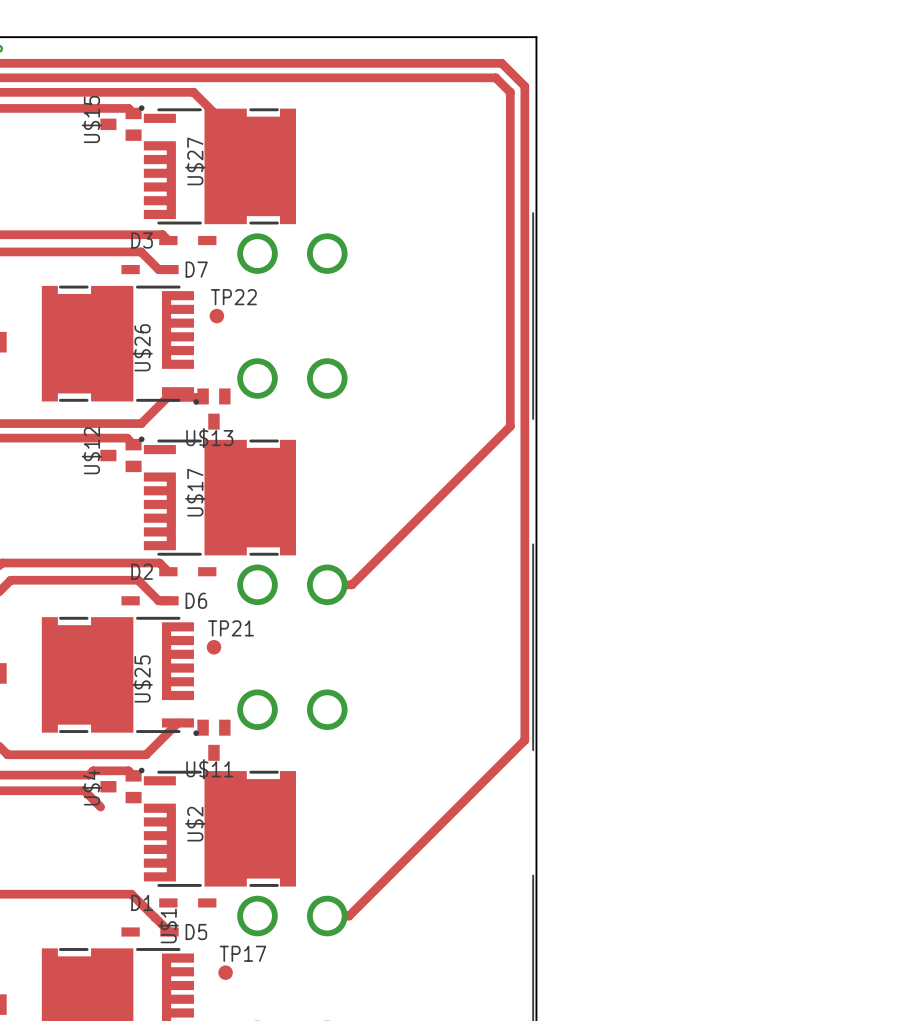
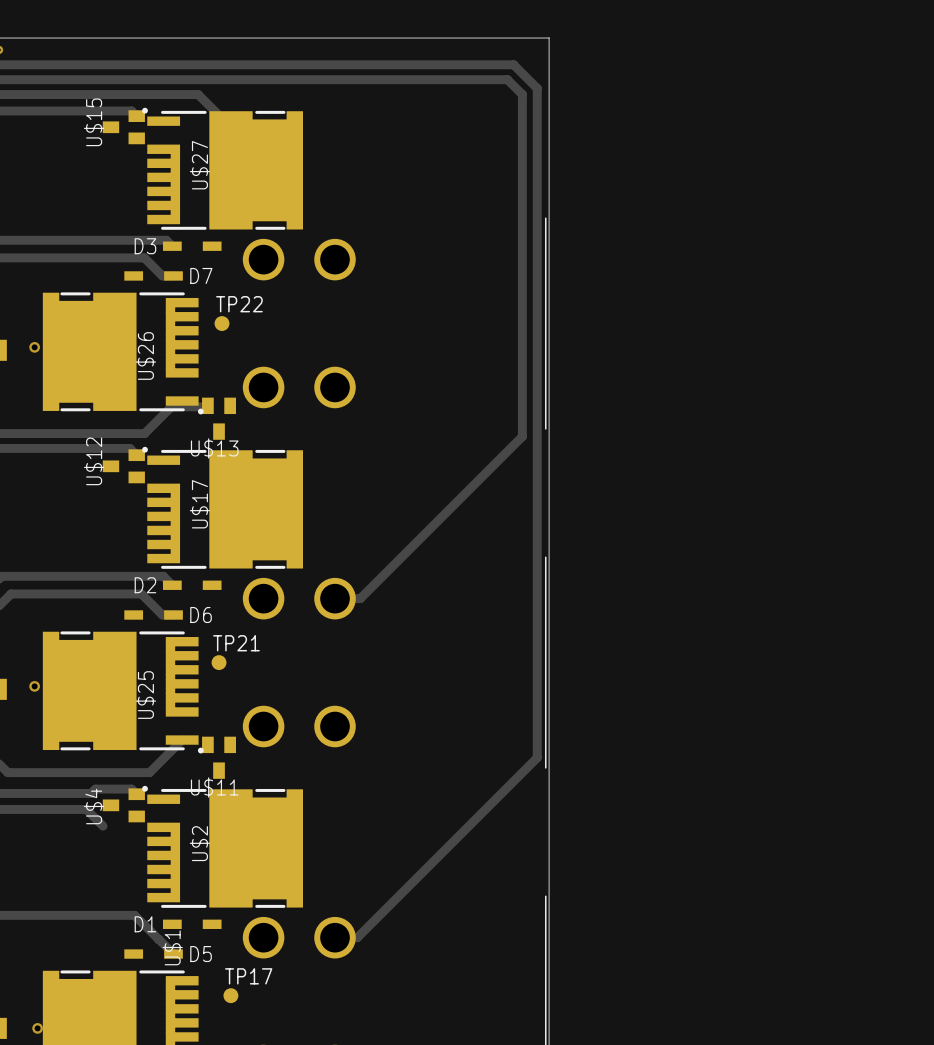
via: none -> (34, 347)
via: none -> (34, 686)
via: none -> (37, 1028)

